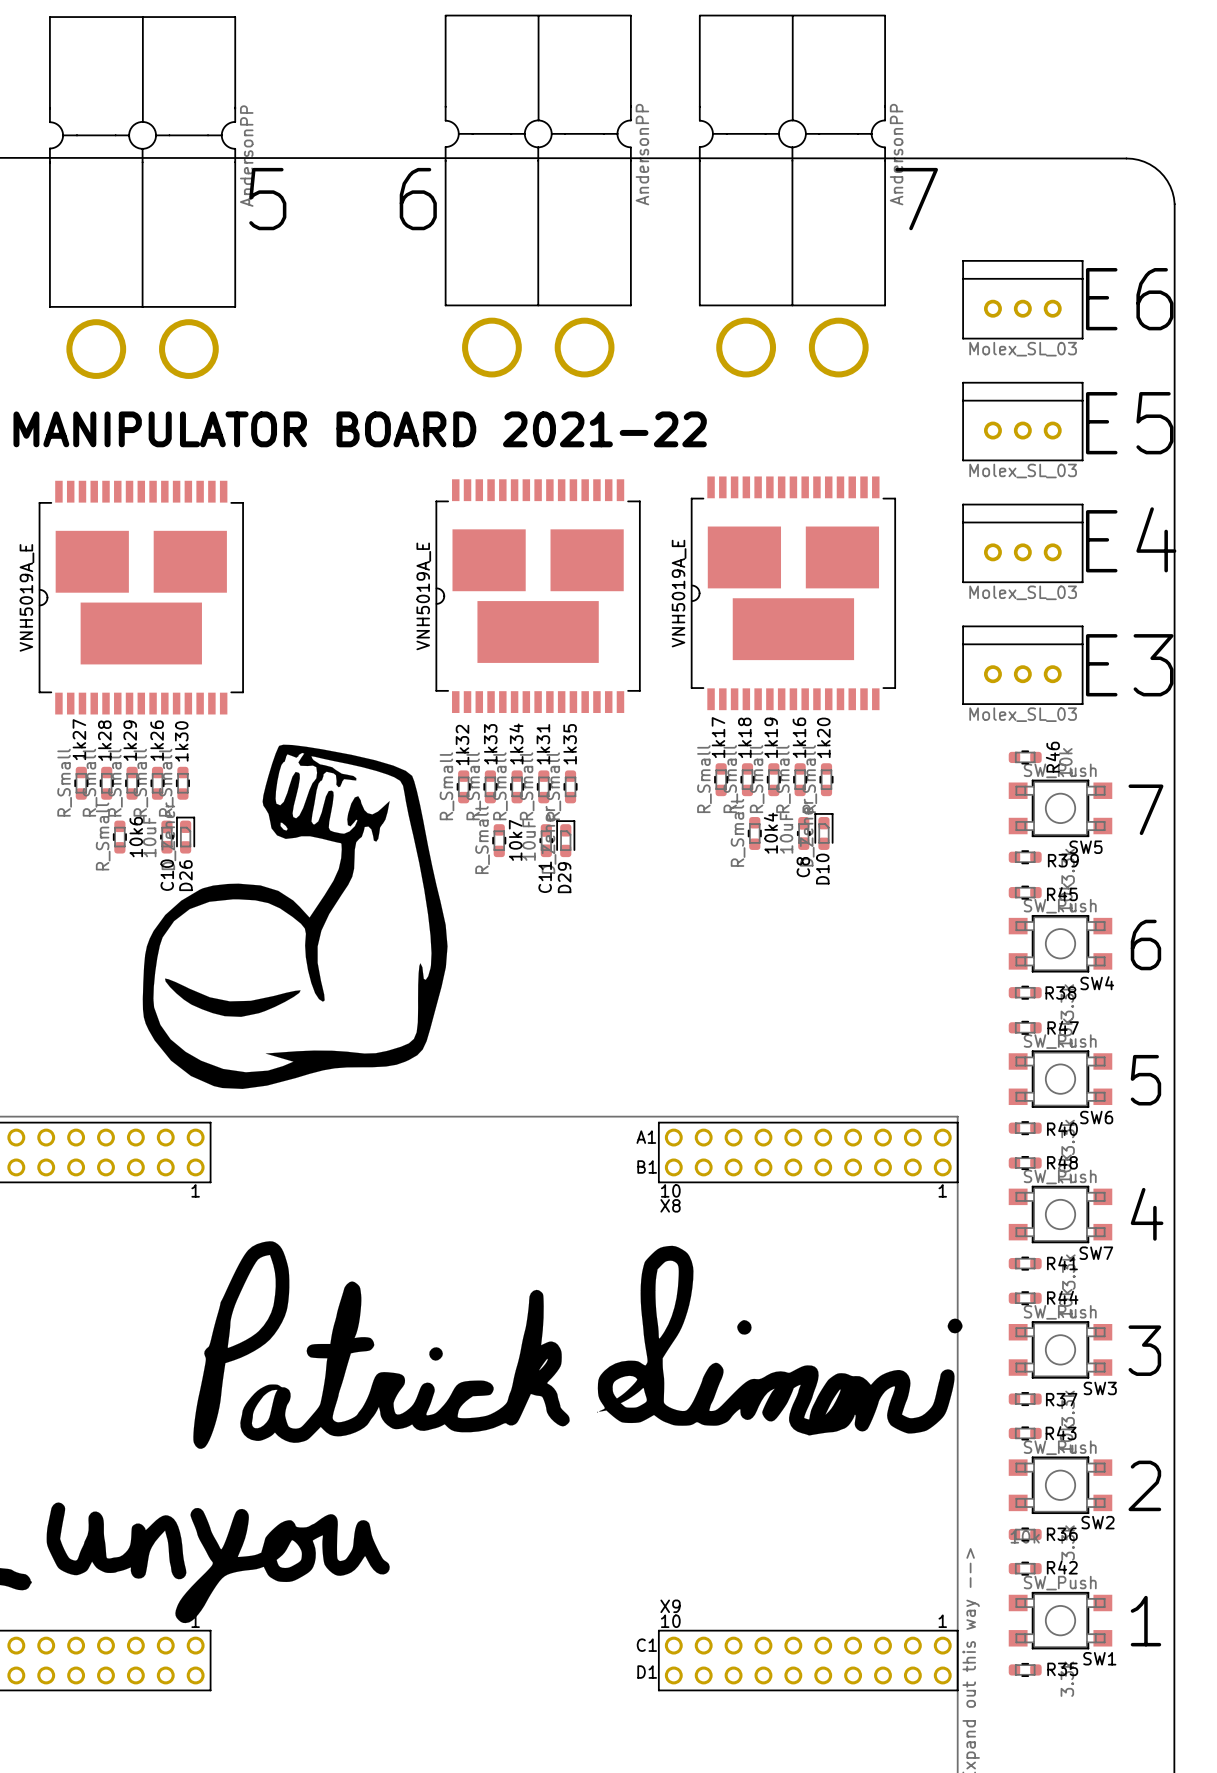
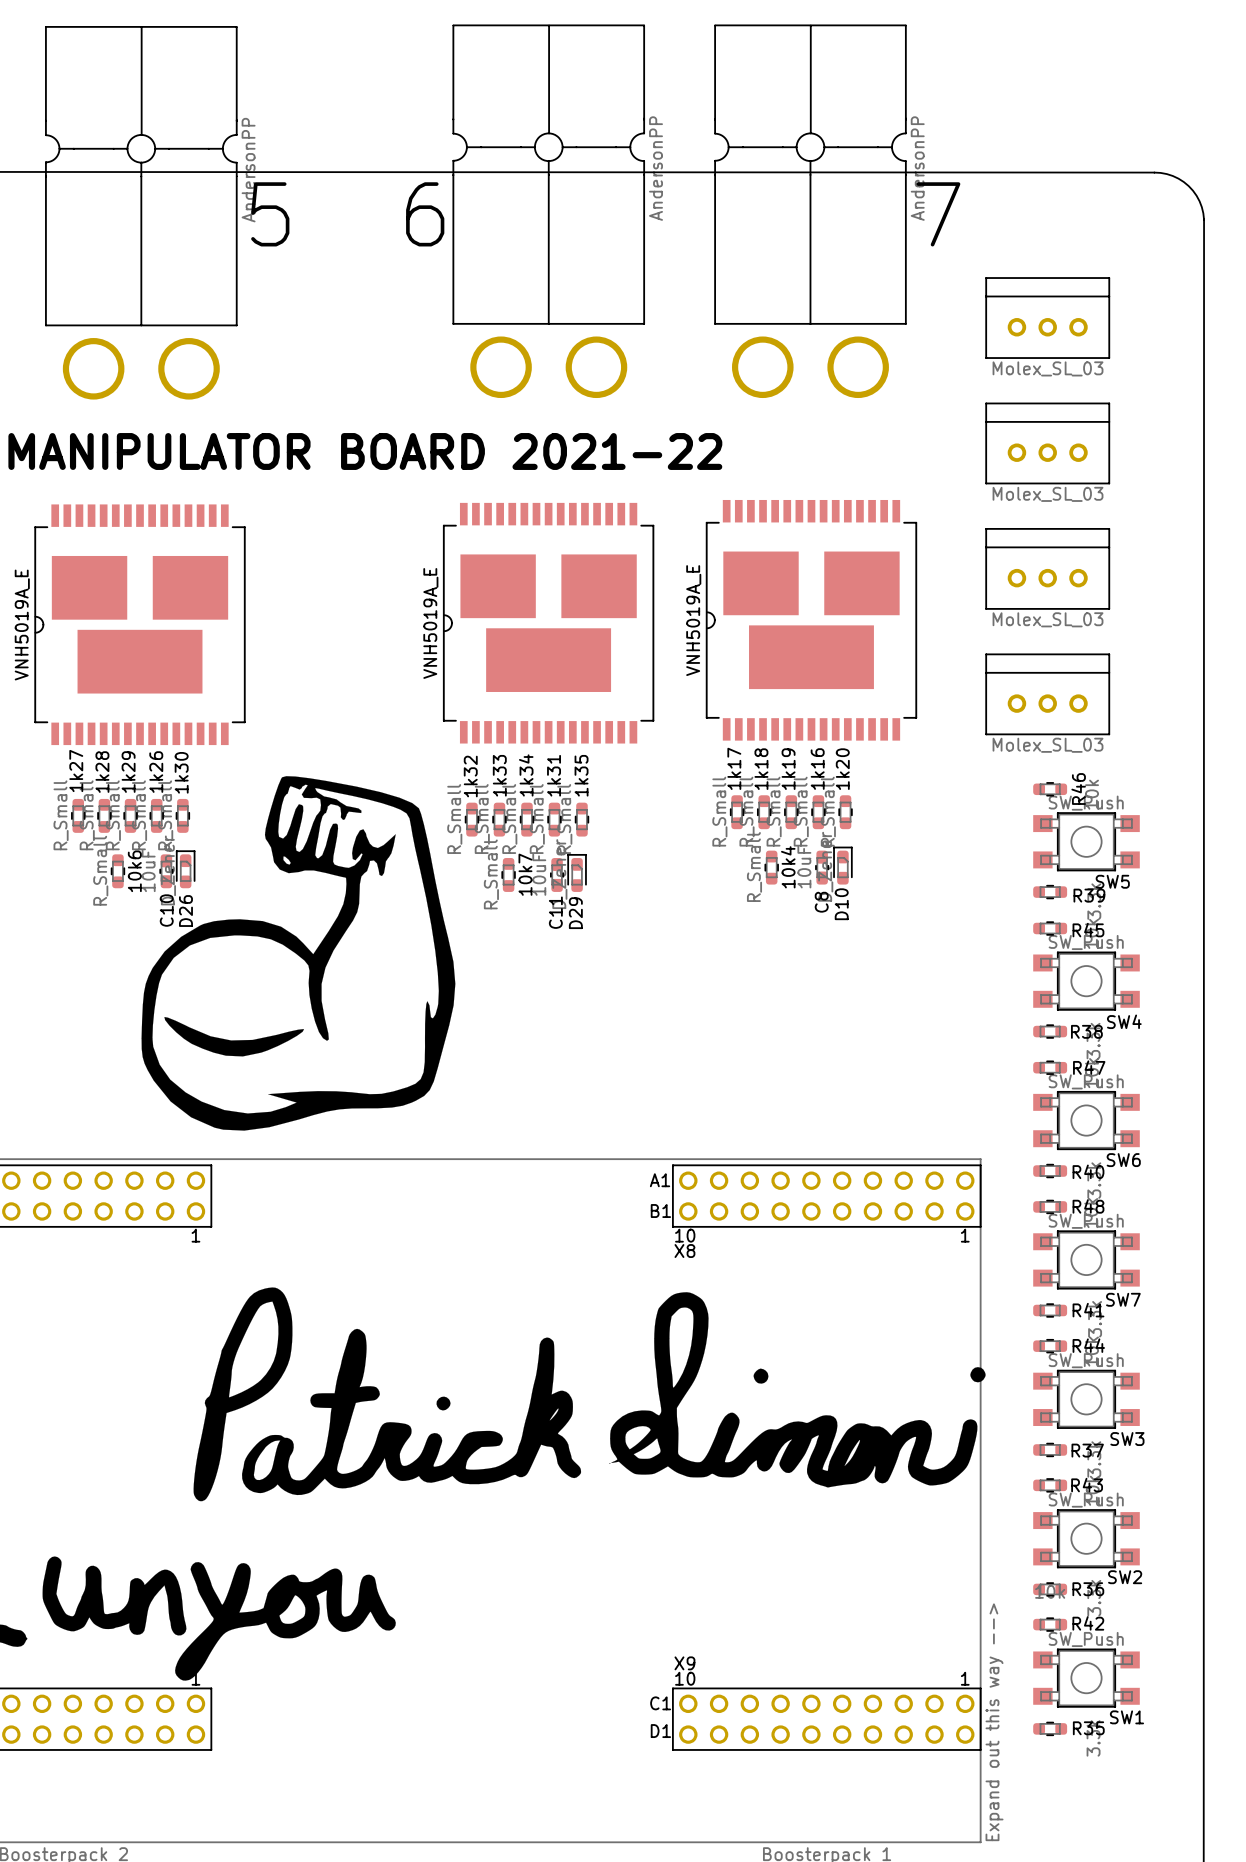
text: E6 (1129, 299) -> none
text: E5 (1129, 423) -> none
text: E4 (1131, 539) -> none
text: E3 (1129, 665) -> none
text: 7 (1145, 809) -> none
text: 6 (1145, 944) -> none
text: 5 (1145, 1080) -> none
text: 4 (1147, 1214) -> none
text: 3 (1144, 1350) -> none
text: 2 (1144, 1485) -> none
text: 1 (1145, 1621) -> none

